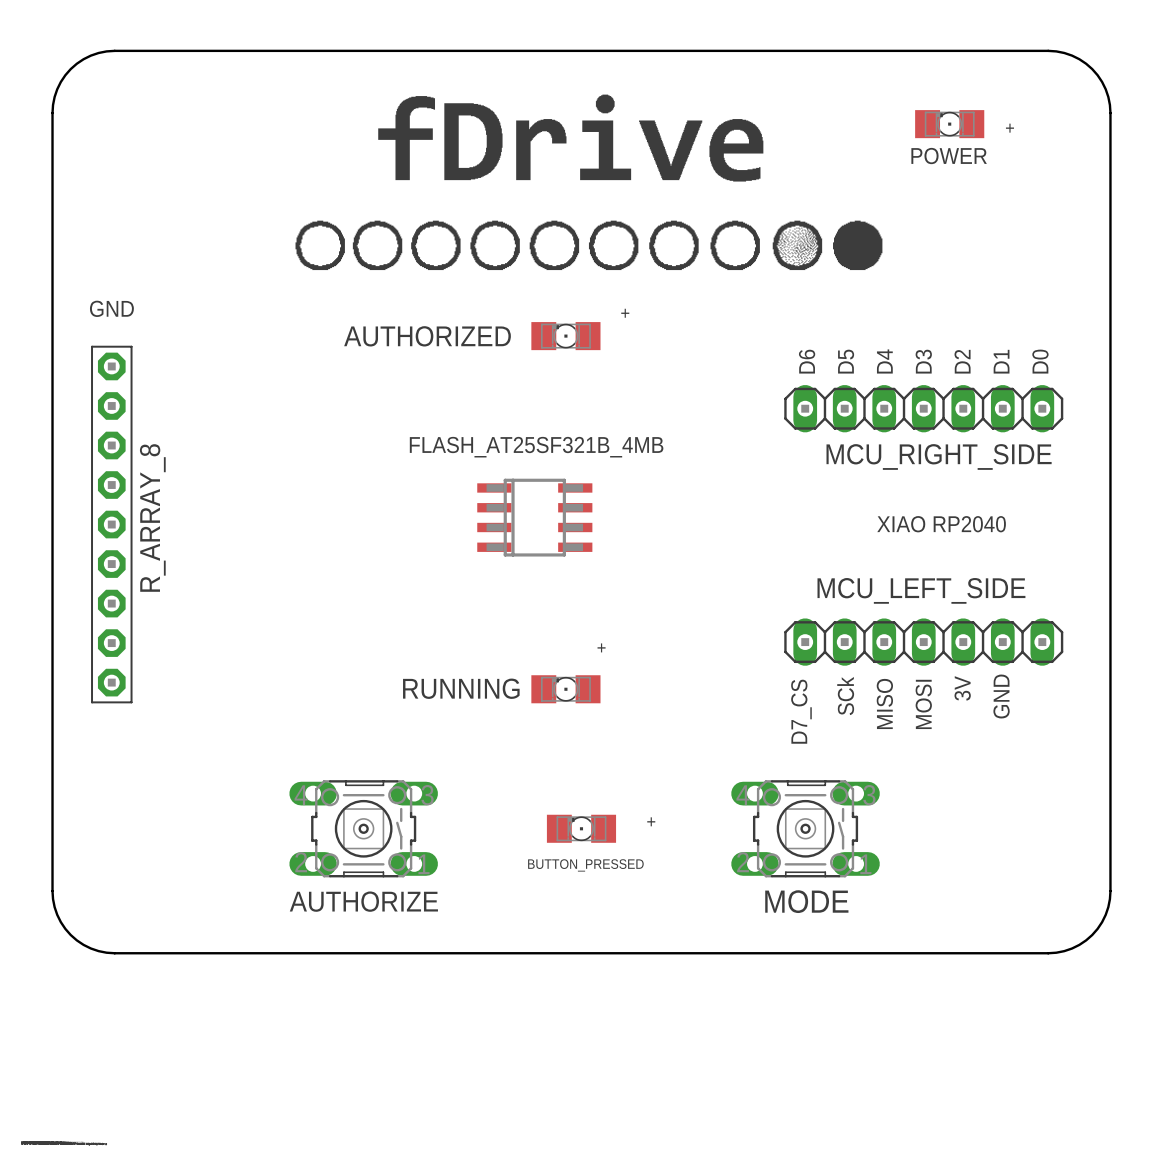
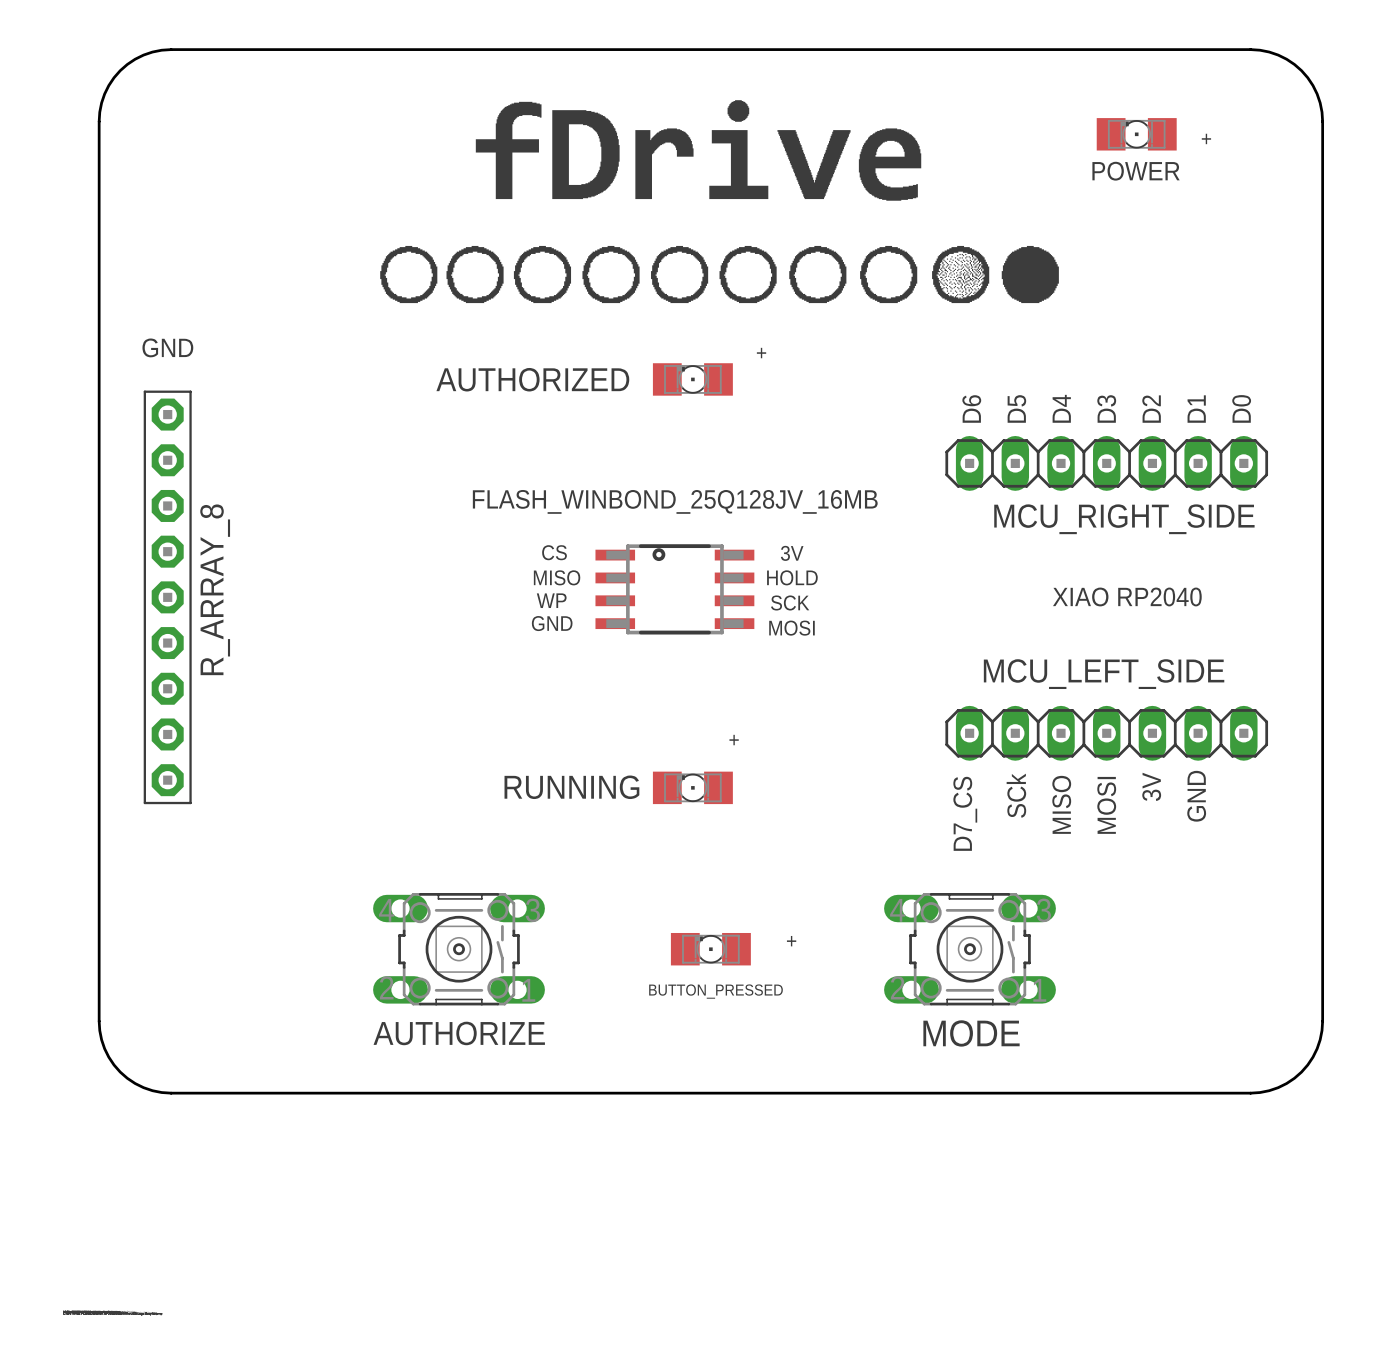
text: none -> CS (554, 552)
text: none -> 3V (792, 553)
text: none -> MISO (557, 577)
text: none -> HOLD (792, 577)
FLASH_AT25SF321B_4MB: (534, 517) -> none
FLASH_WINBOND_25Q128JV_16MB: none -> (674, 589)
text: none -> WP (551, 600)
text: none -> SCK (790, 602)
text: none -> GND (552, 623)
text: none -> MOSI (791, 628)

